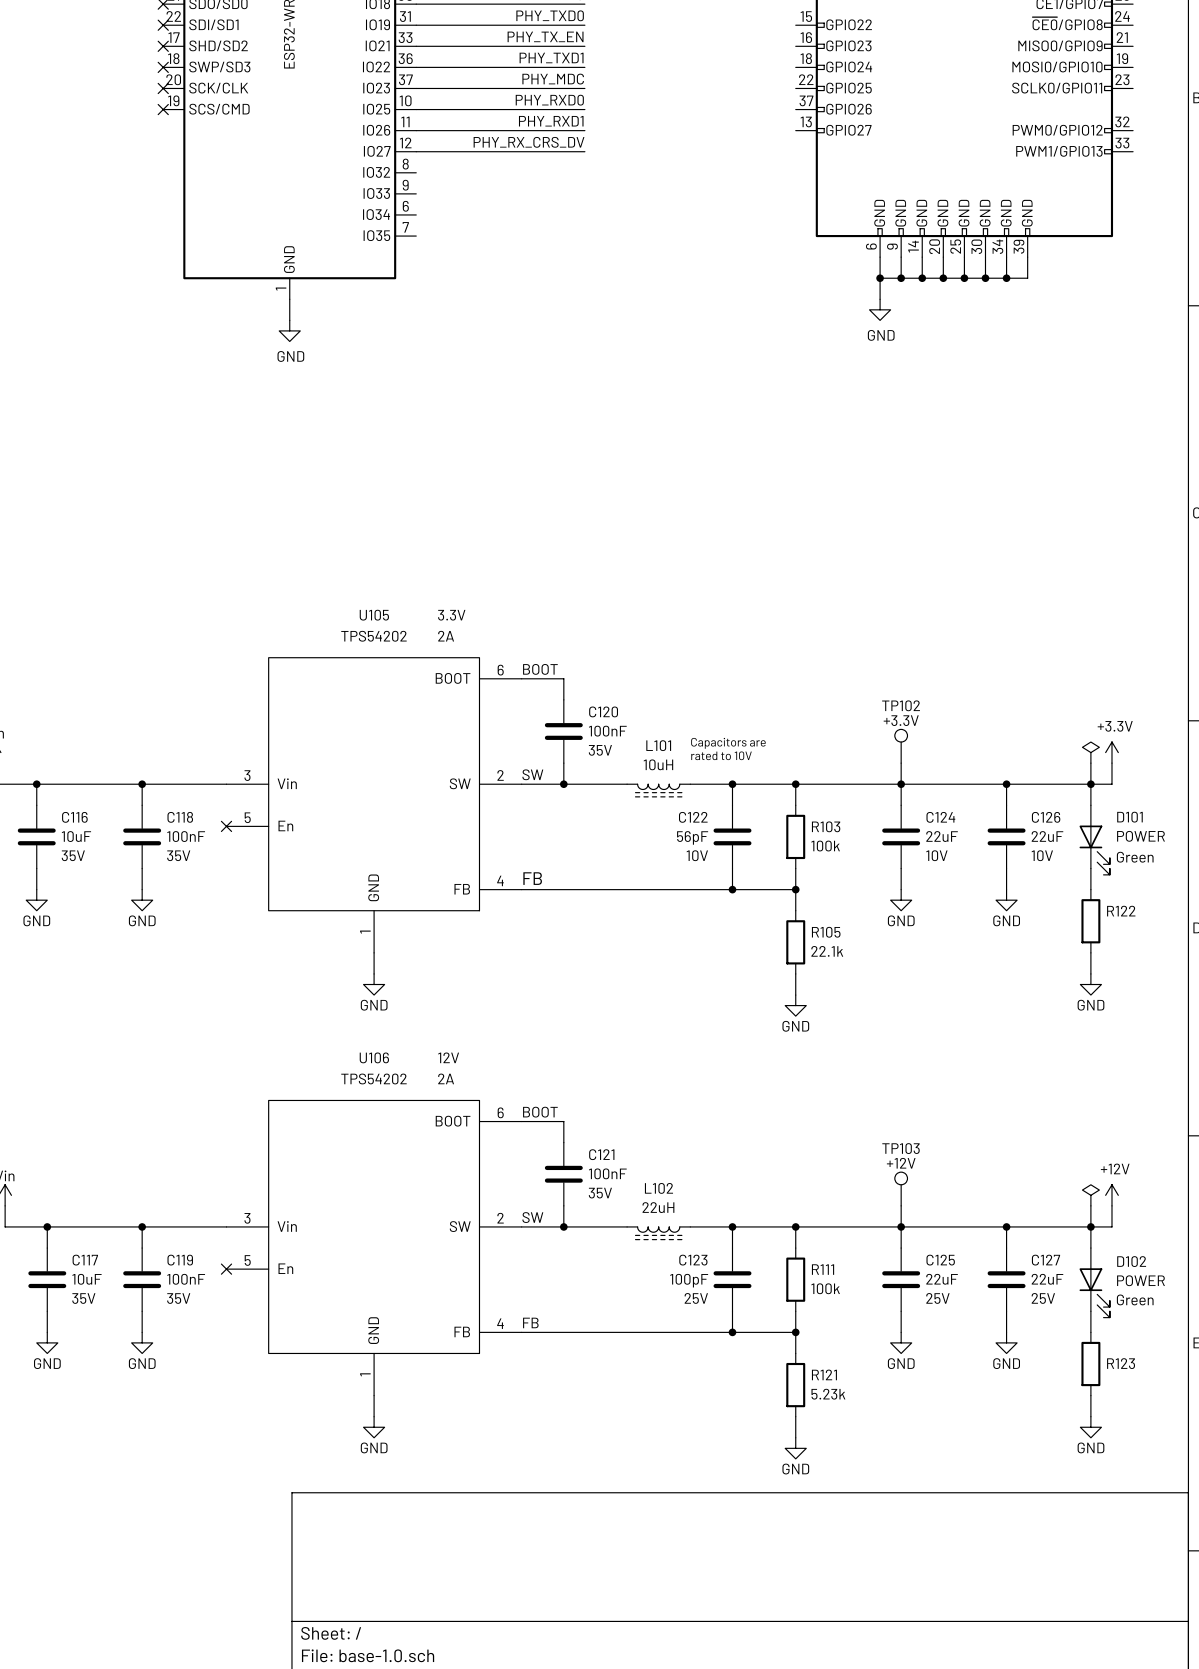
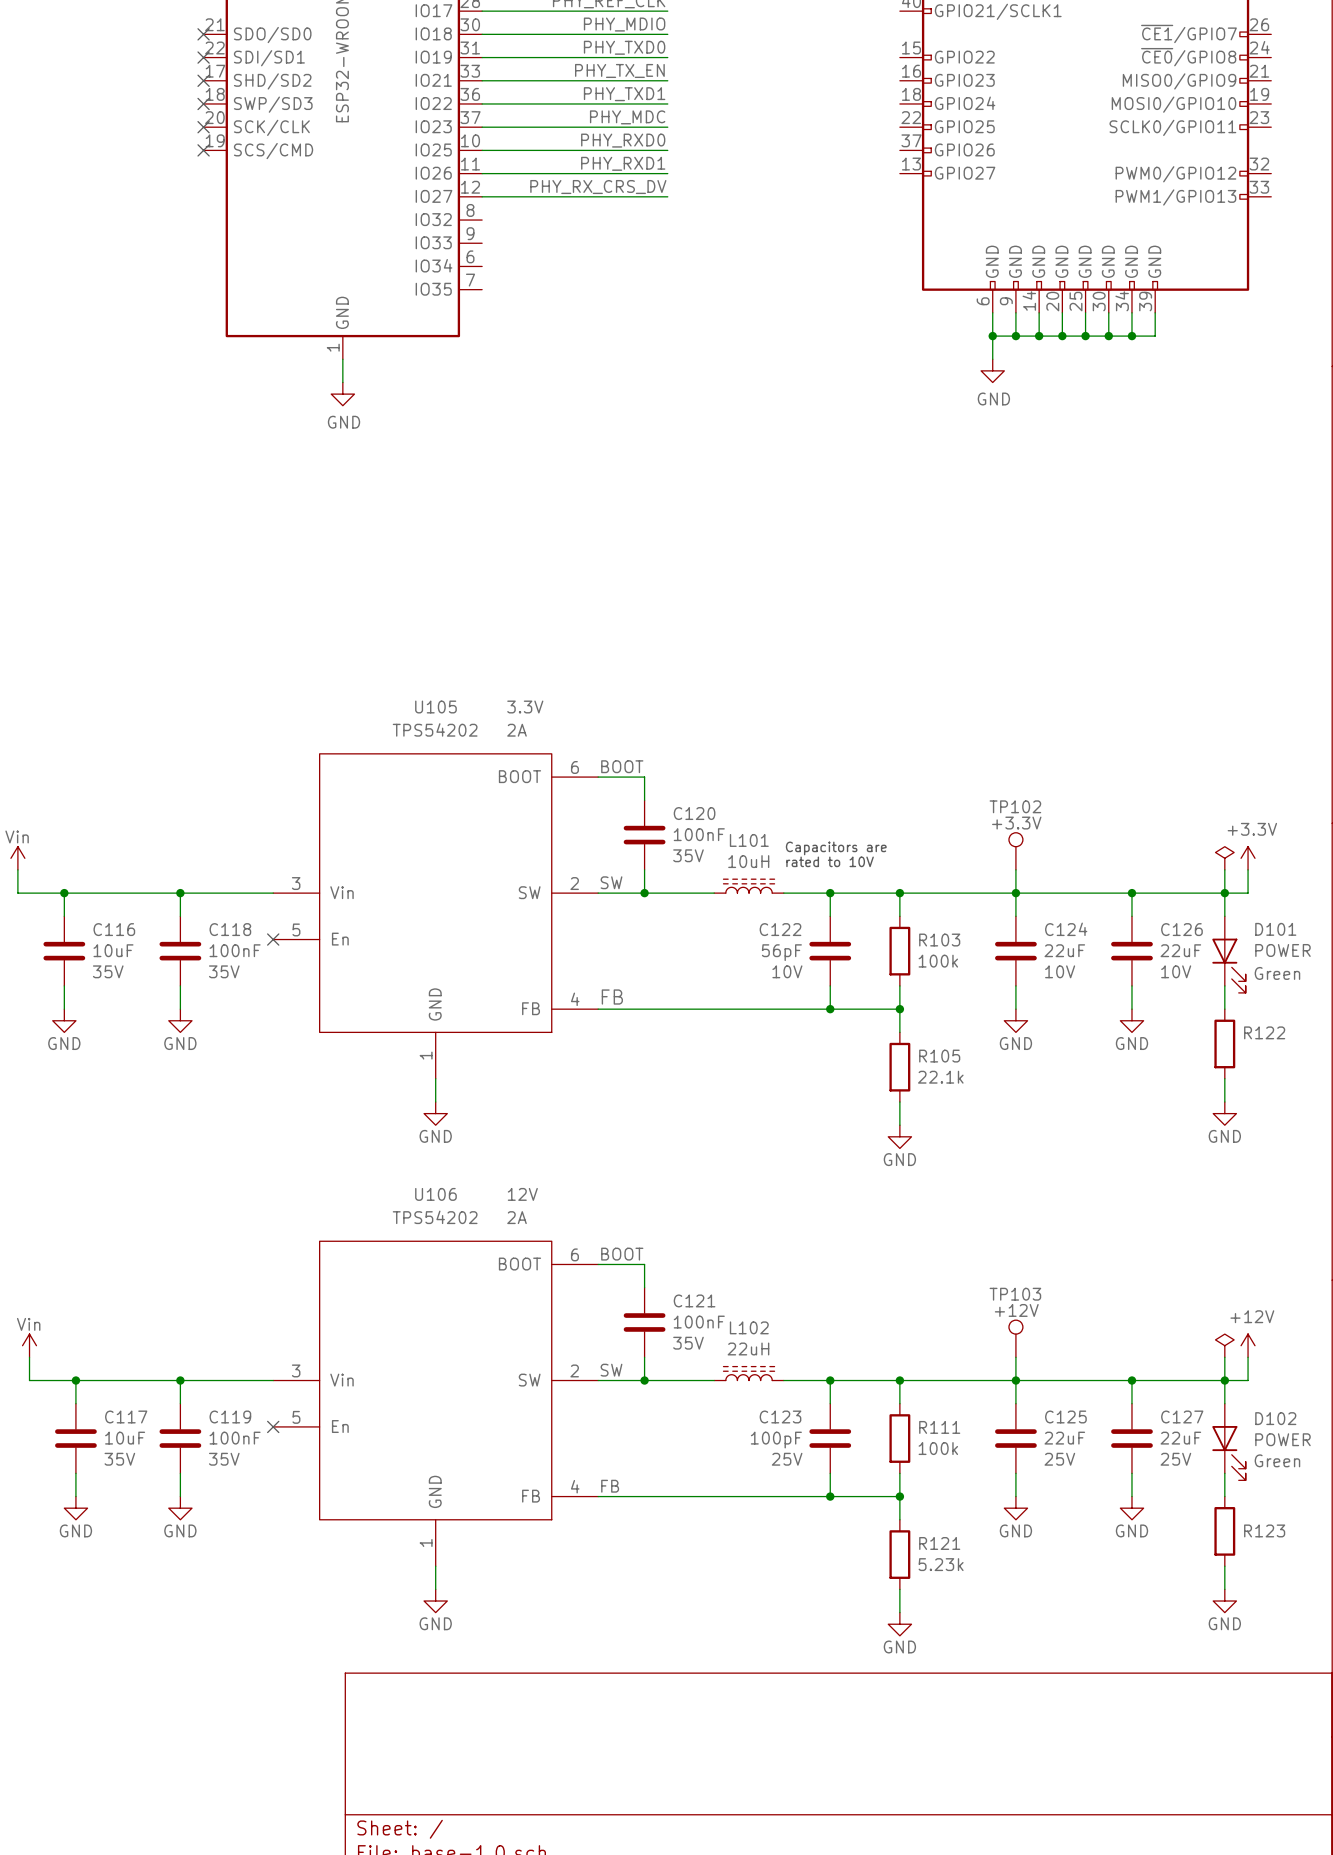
L101 rotation: 0° (658, 790) -> 180° (749, 886)
L102 rotation: 0° (658, 1233) -> 180° (749, 1373)

